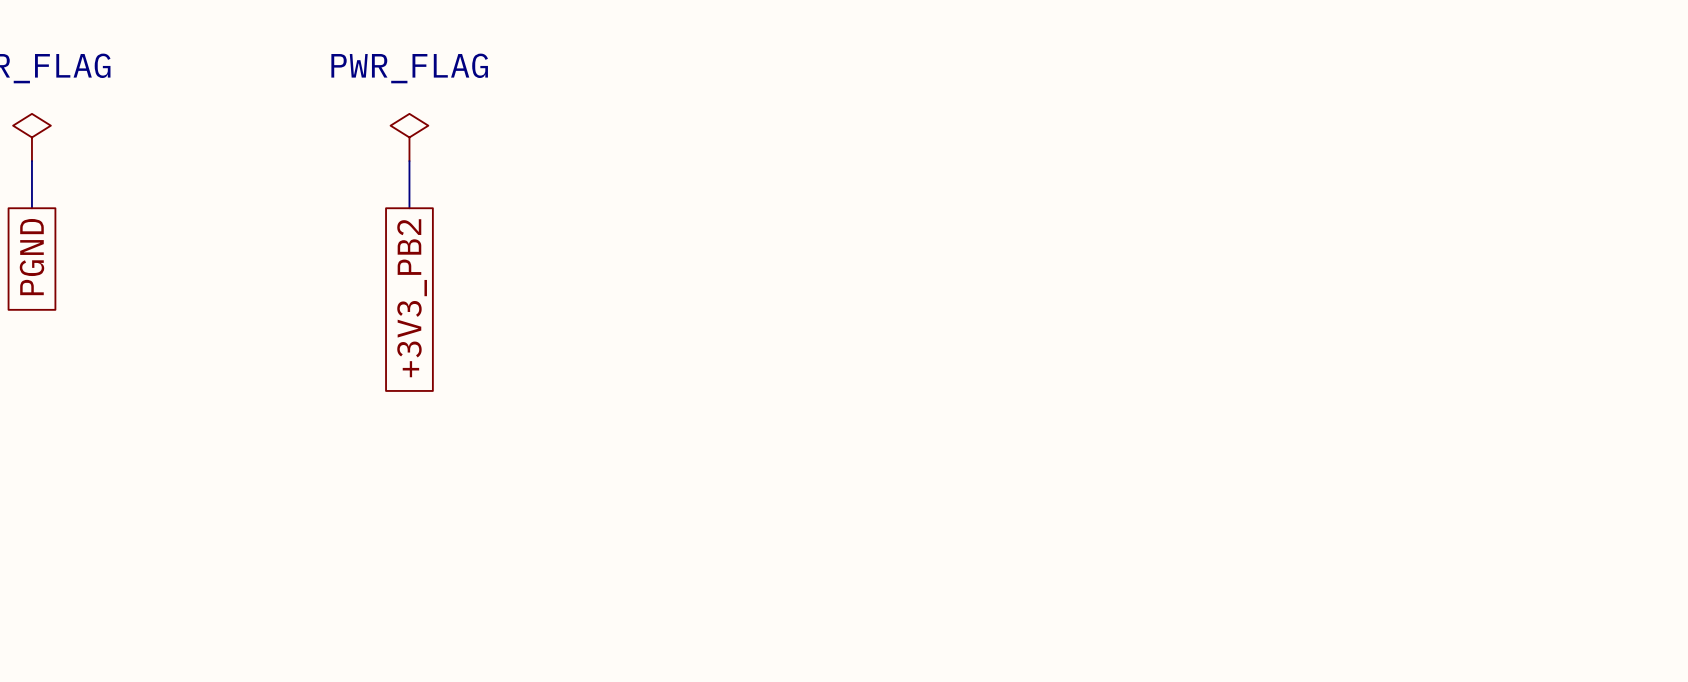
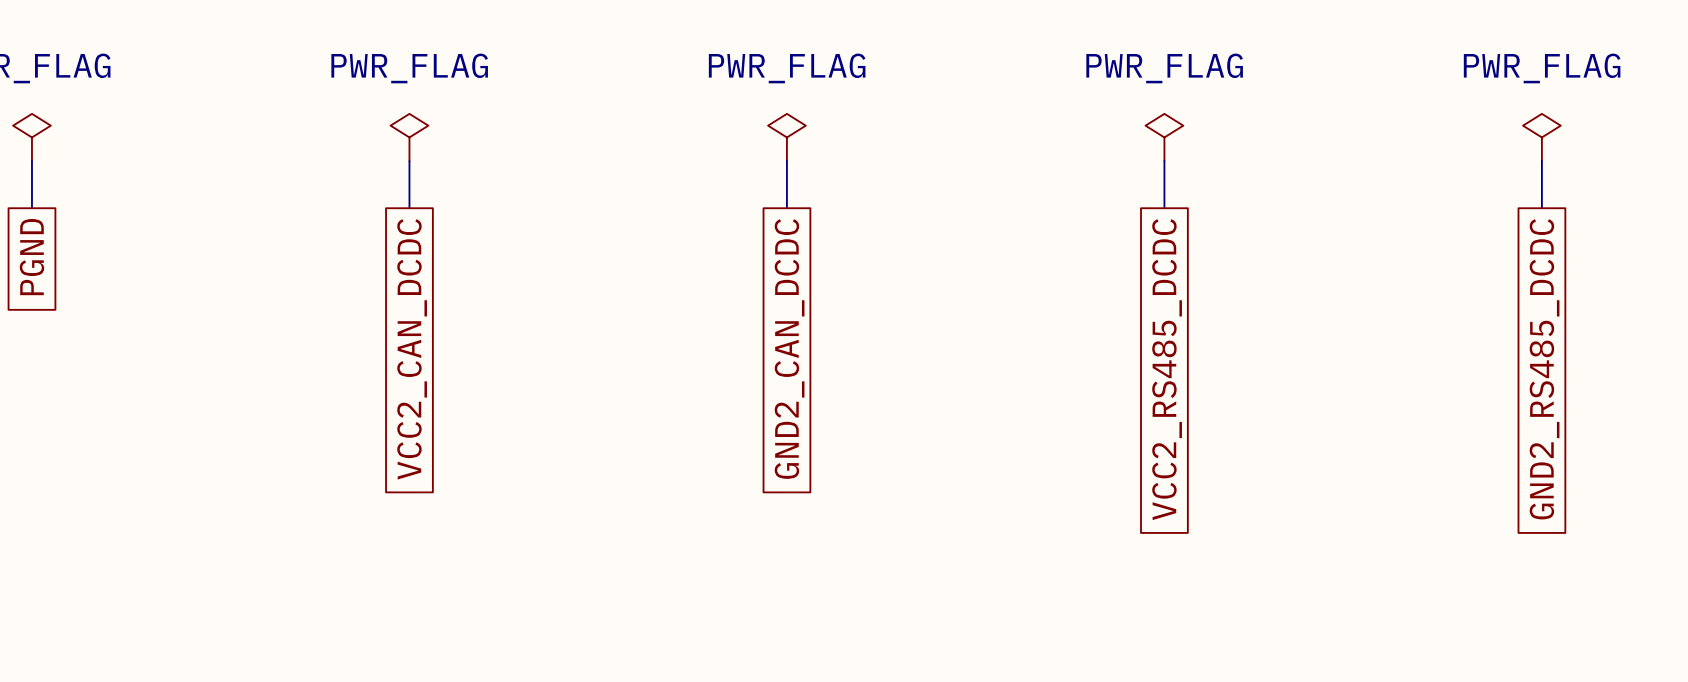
power symbol: none -> PWR_FLAG (786, 137)
power symbol: none -> PWR_FLAG (1164, 137)
power symbol: none -> PWR_FLAG (1541, 137)
wire: none -> (786, 161) (786, 208)
wire: none -> (1164, 161) (1164, 208)
wire: none -> (1541, 161) (1541, 208)
global label: +3V3_PB2 (412, 298) -> VCC2_CAN_DCDC (412, 349)
global label: none -> GND2_CAN_DCDC (789, 349)
global label: none -> VCC2_RS485_DCDC (1167, 369)
global label: none -> GND2_RS485_DCDC (1544, 369)

